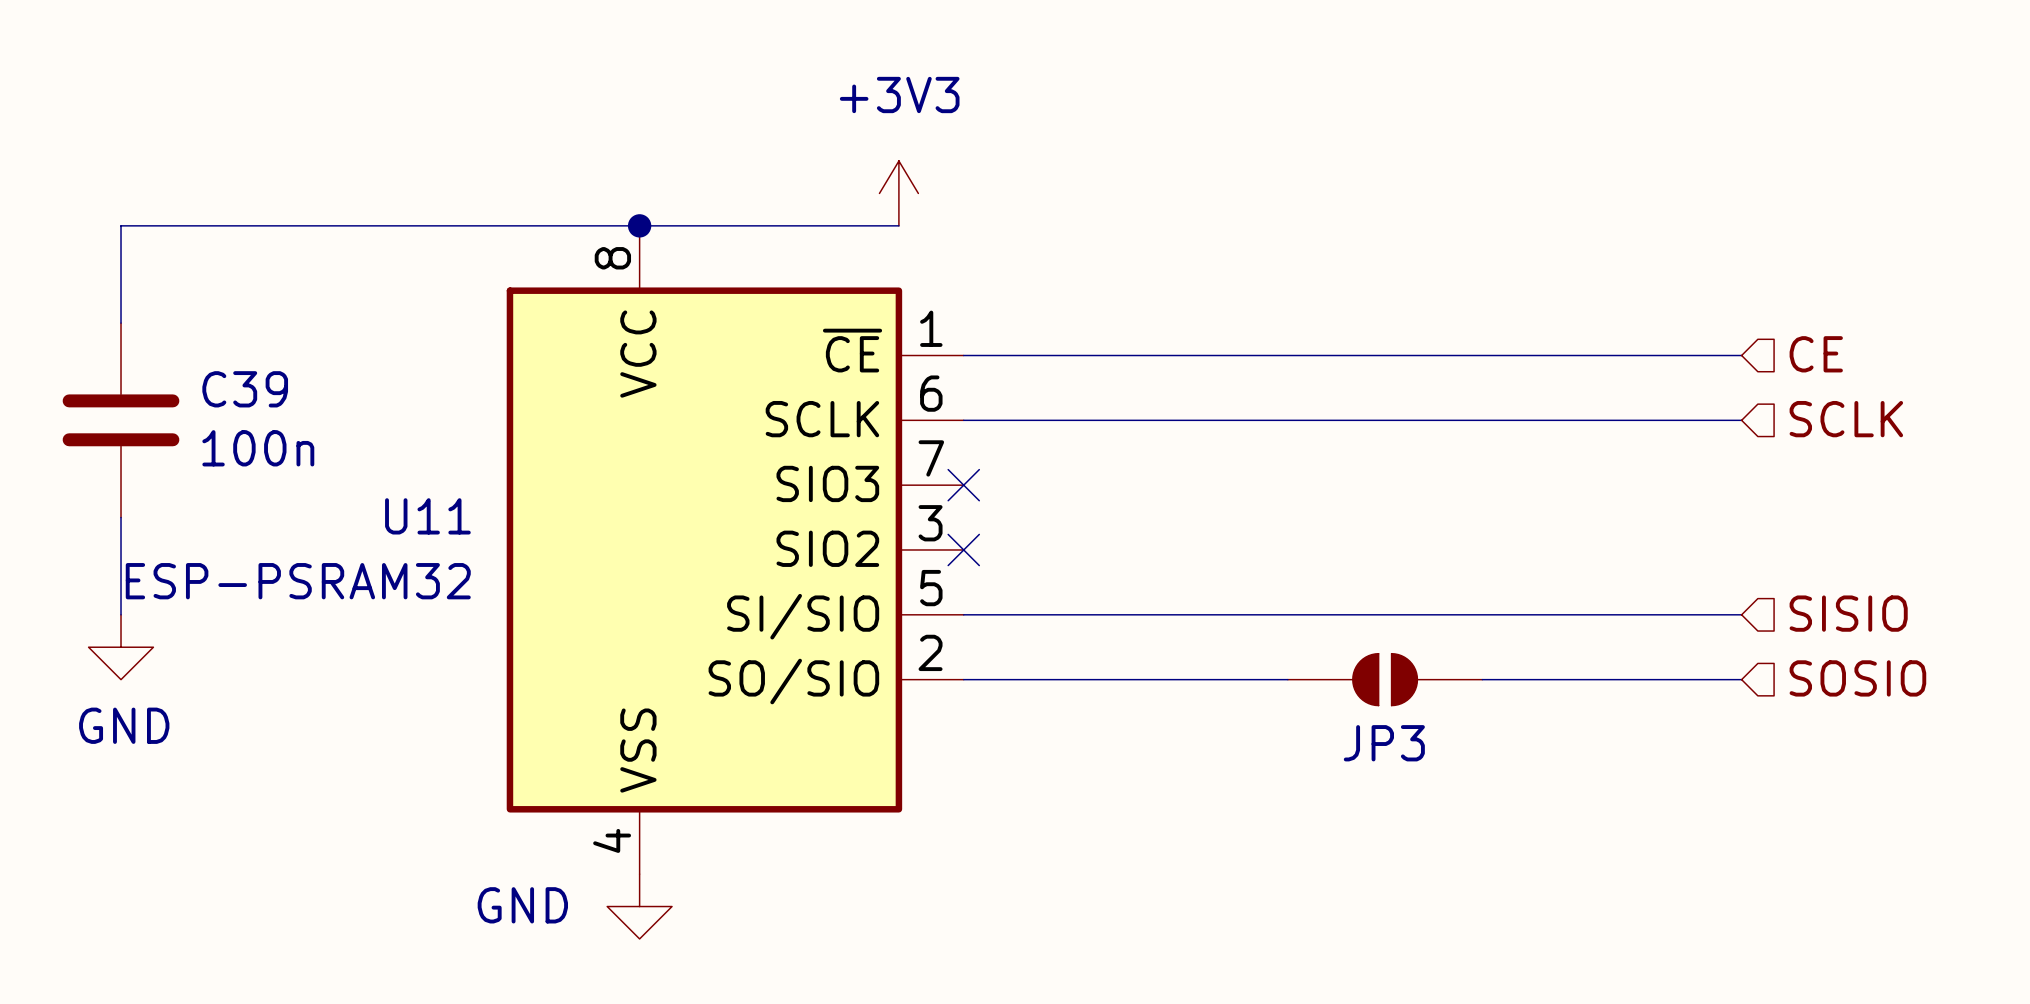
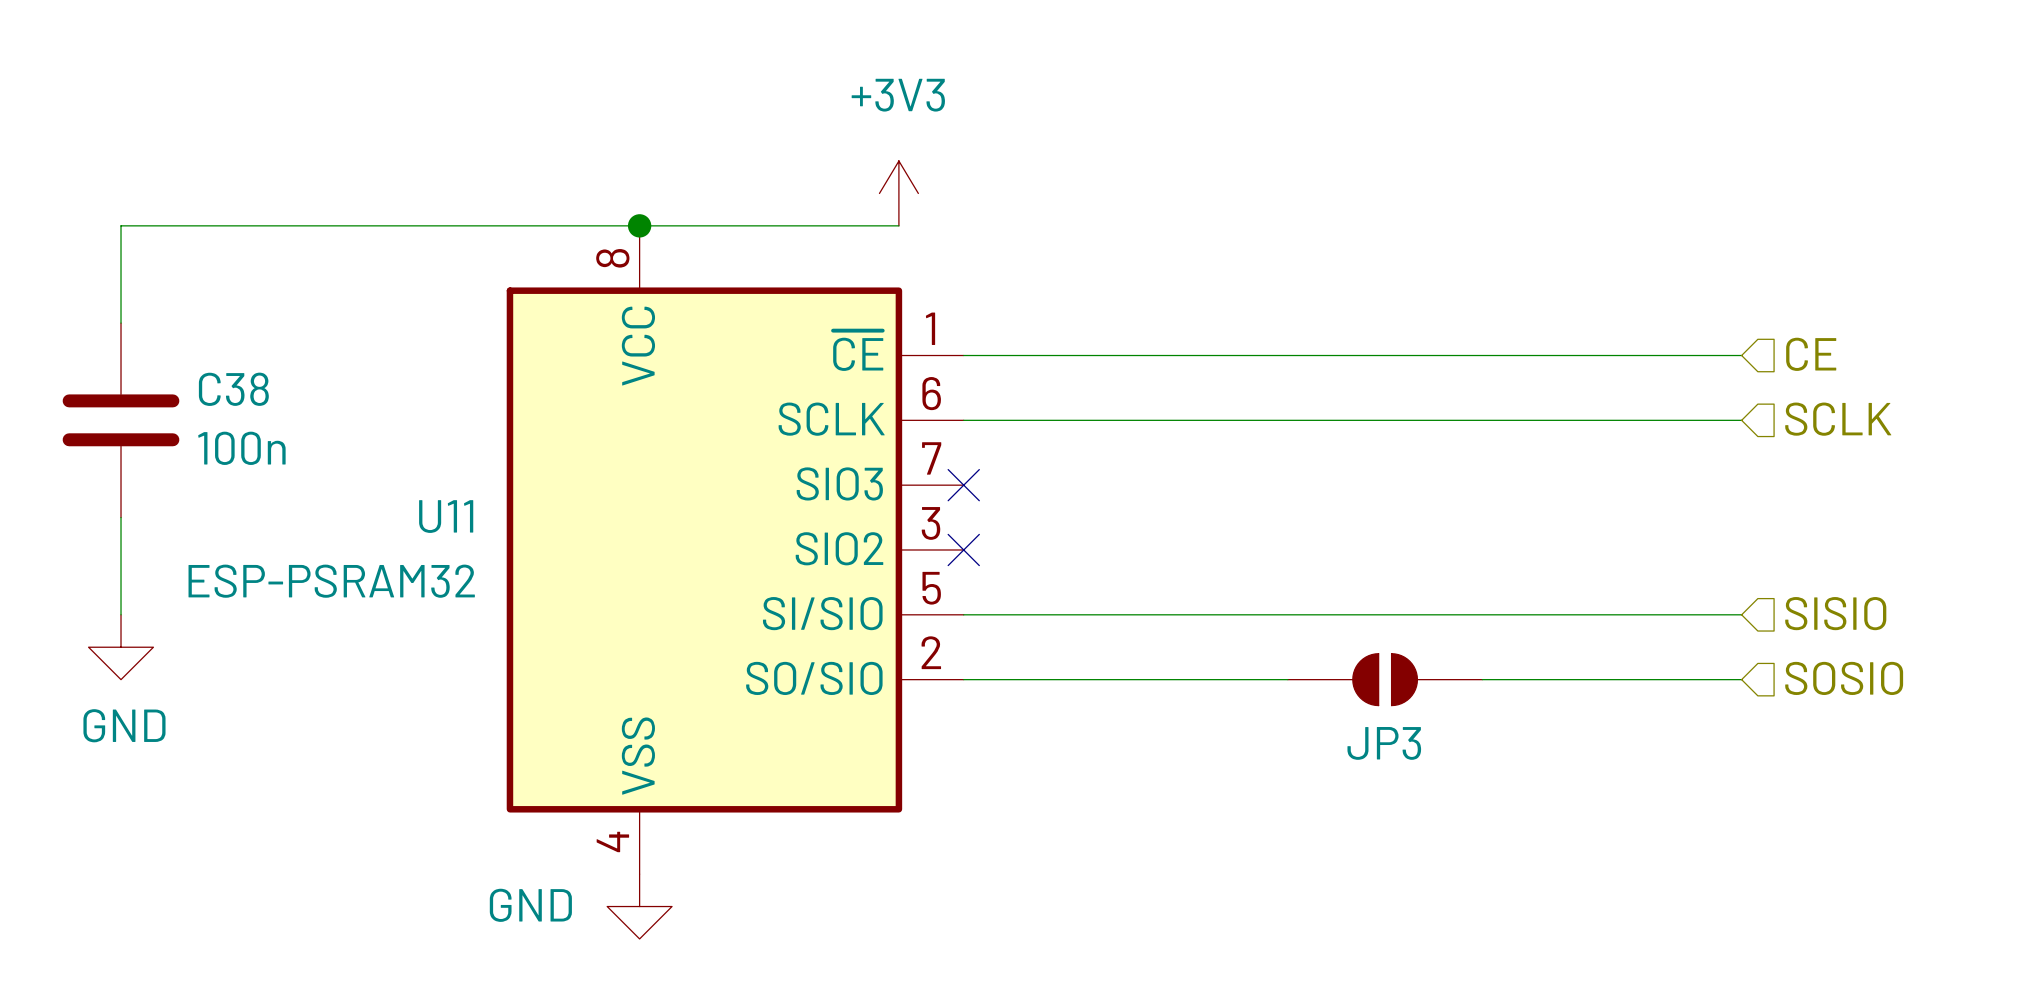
C39 name: C39 (245, 389) -> C38 (233, 389)

